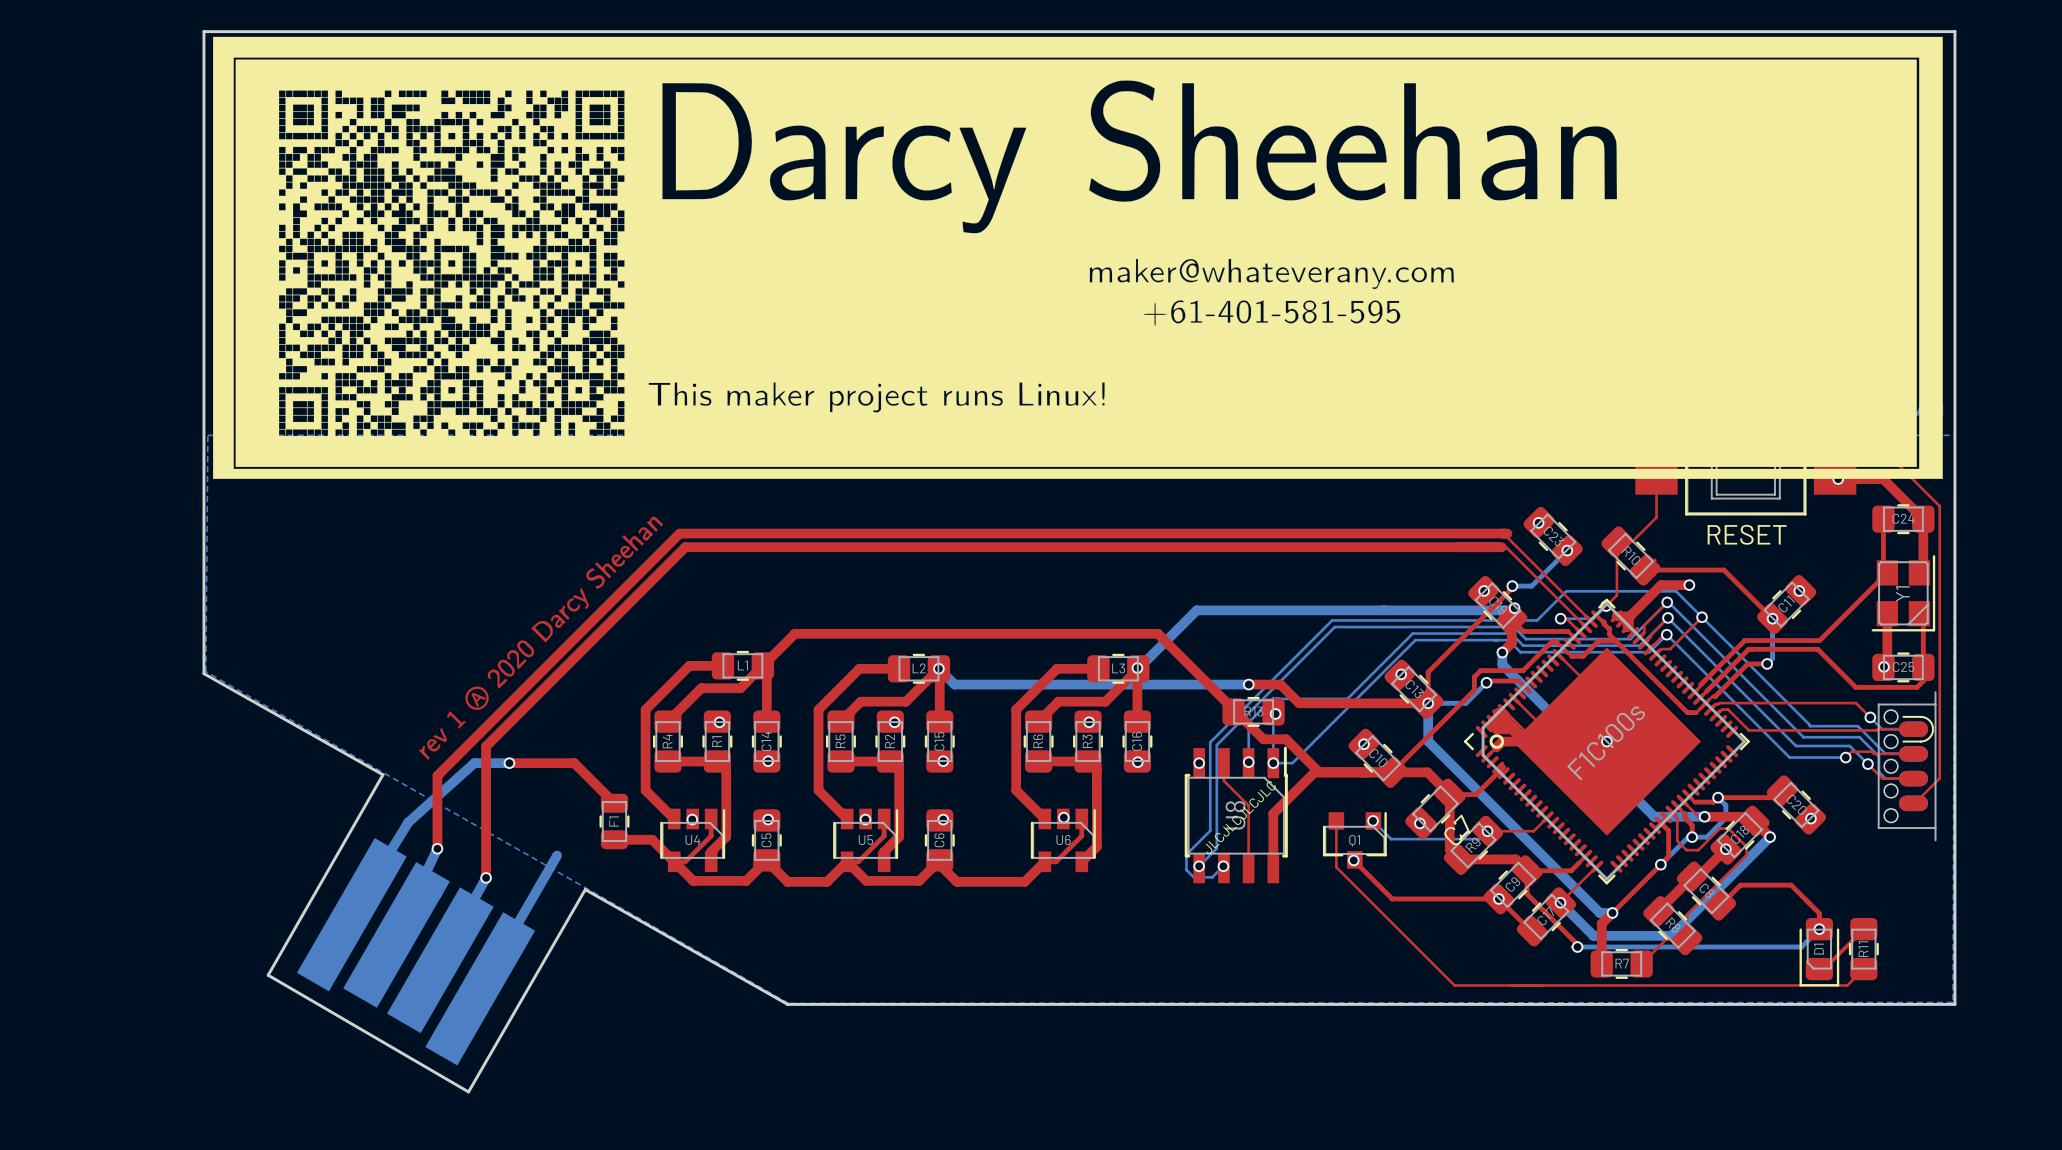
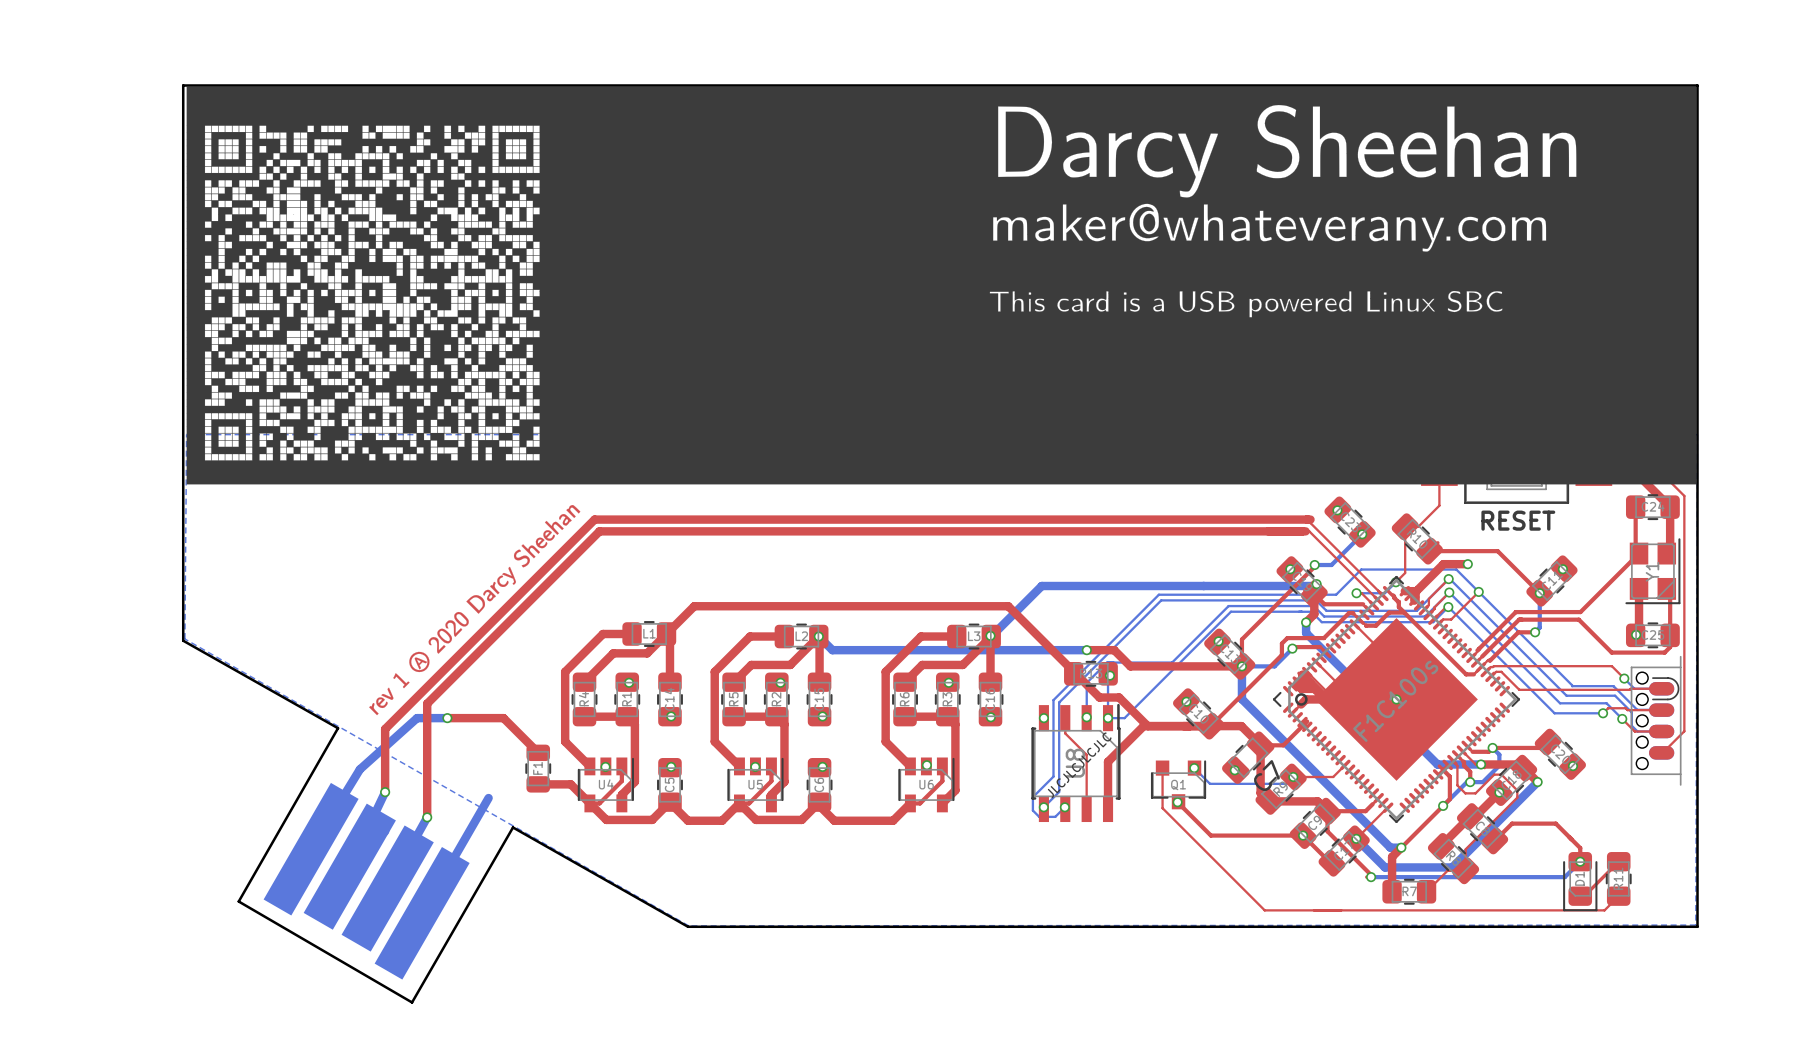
drawing shape: [213, 36, 1943, 479] -> [186, 86, 1697, 485]

